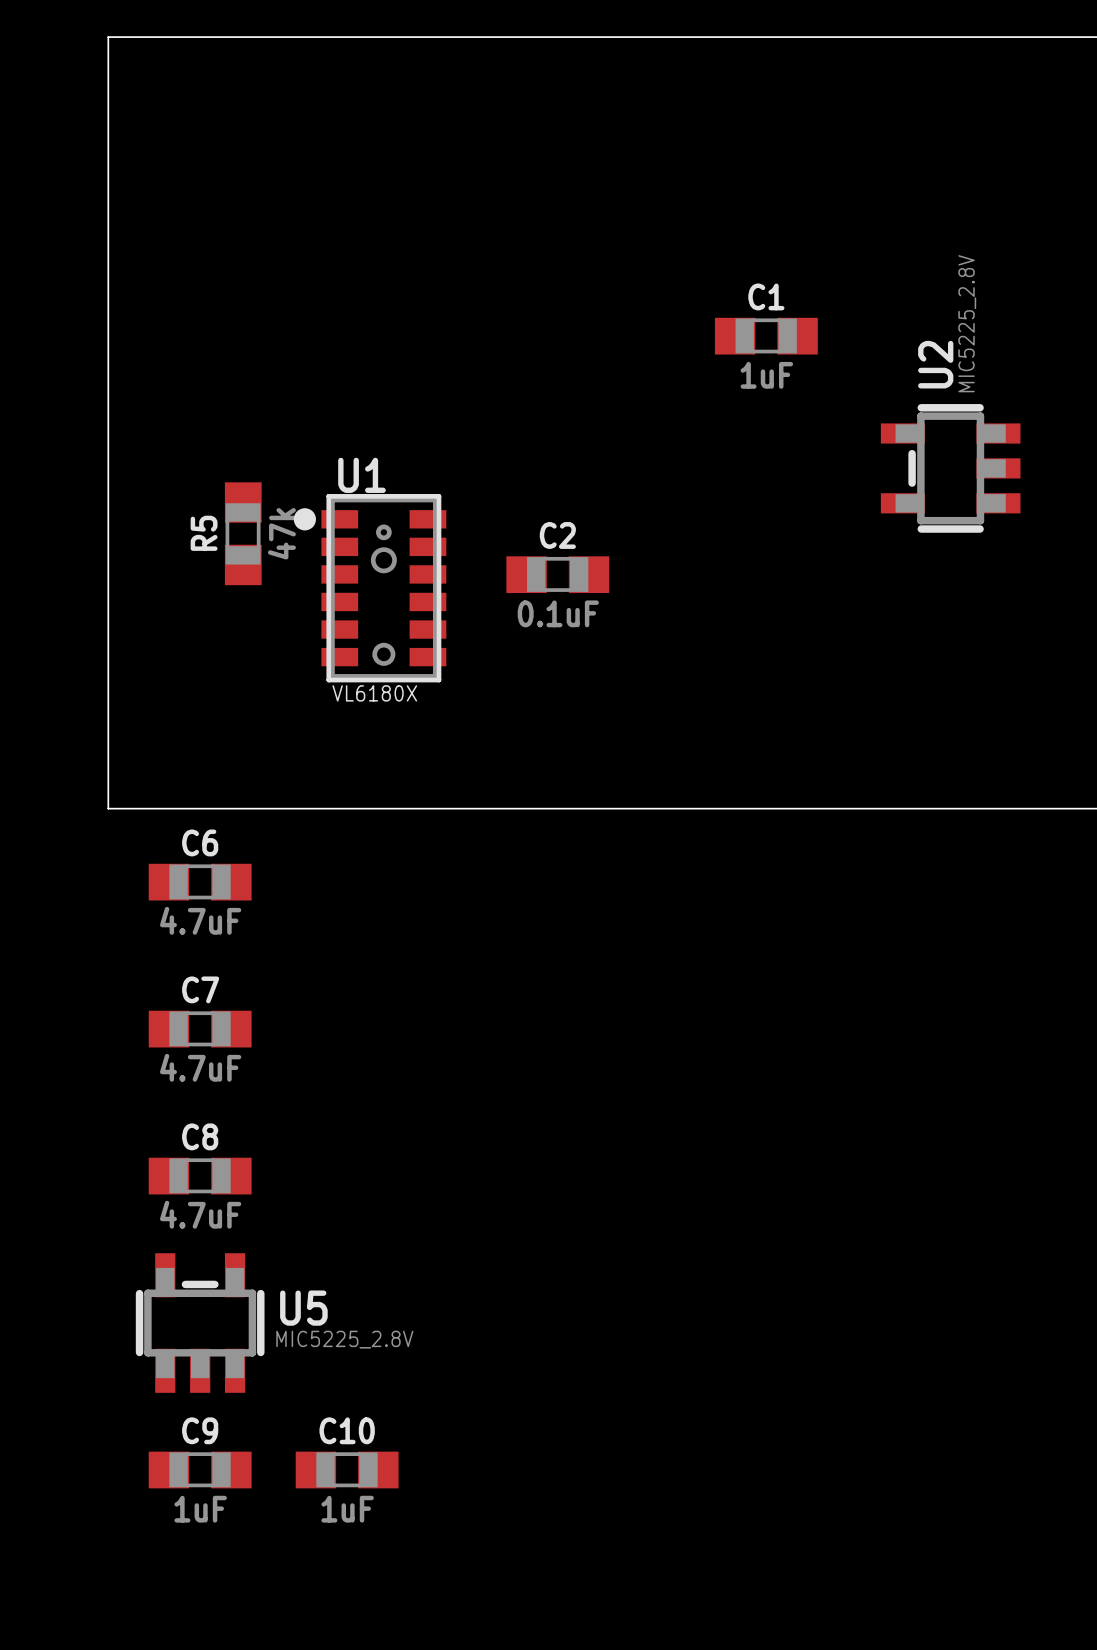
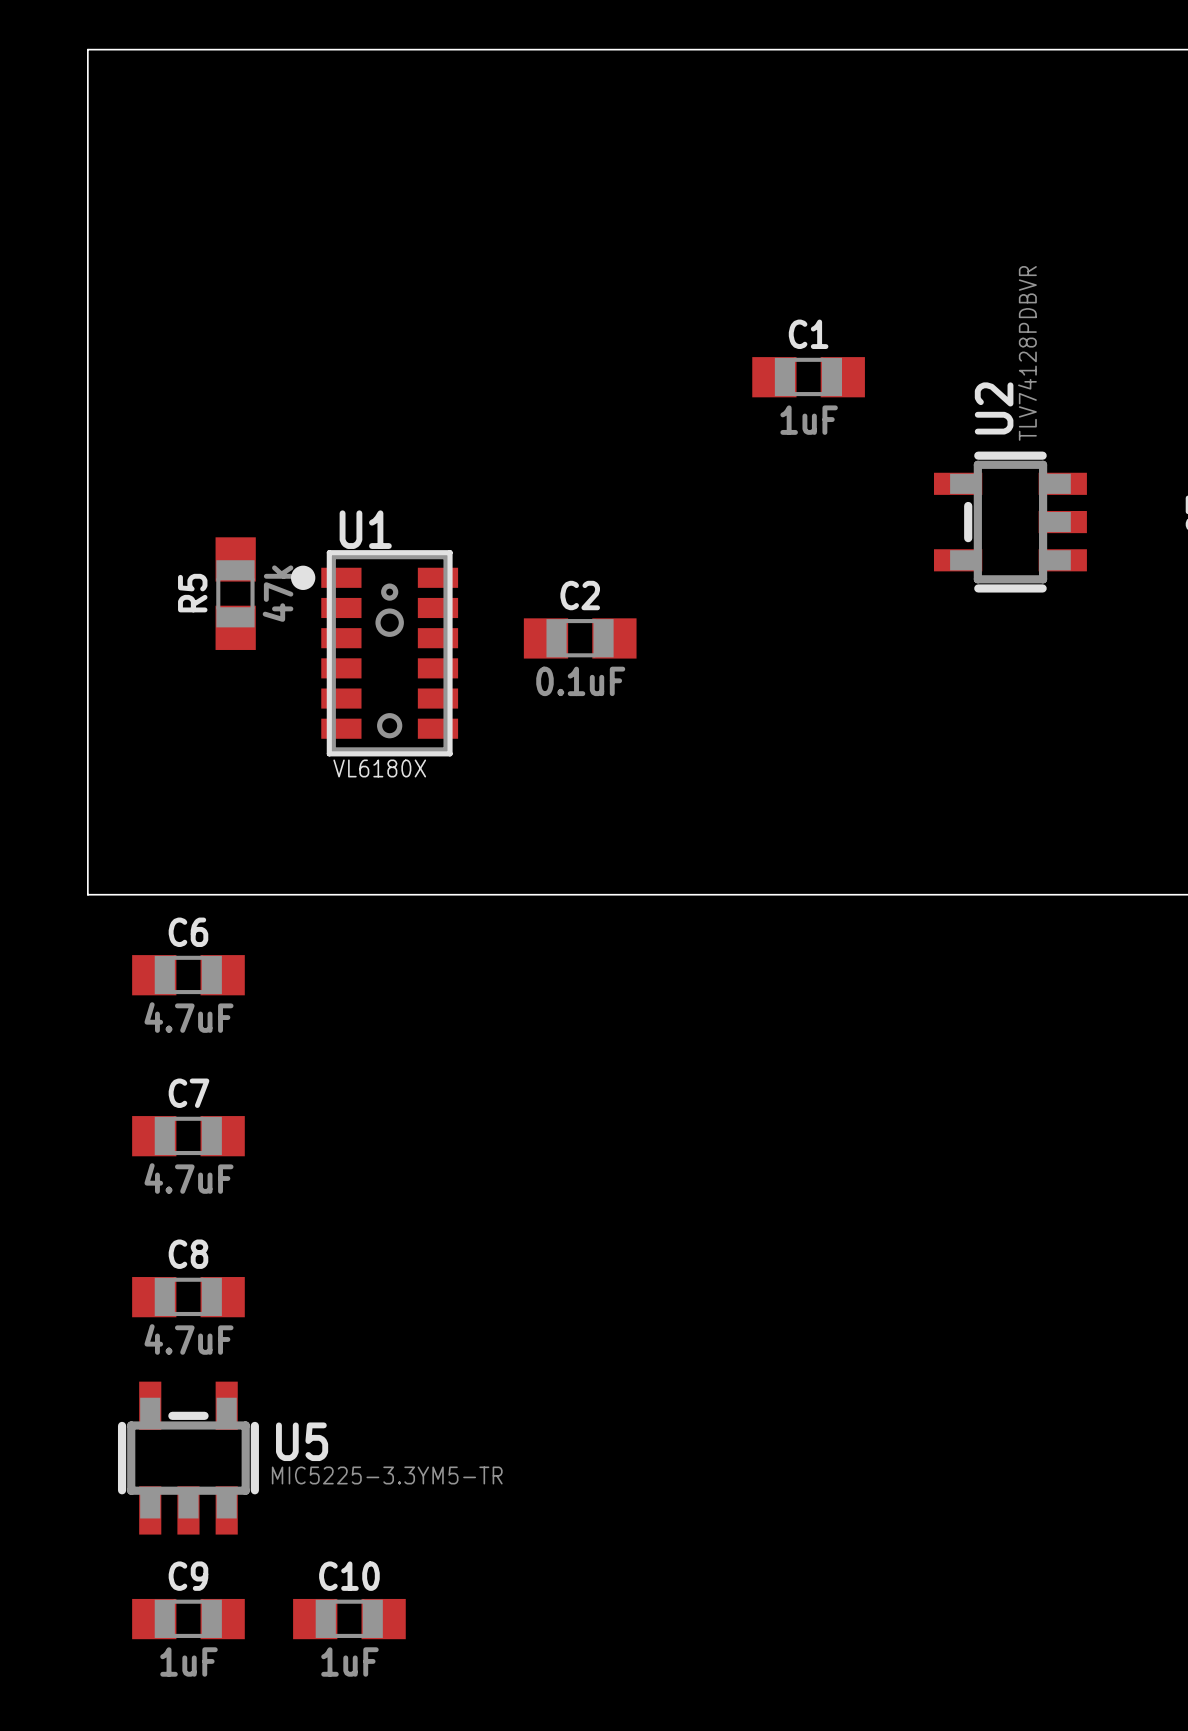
U2 value: MIC5225_2.8V (967, 323) -> TLV74128PDBVR (1027, 353)
U5 value: MIC5225_2.8V (344, 1339) -> MIC5225-3.3YM5-TR (387, 1475)

